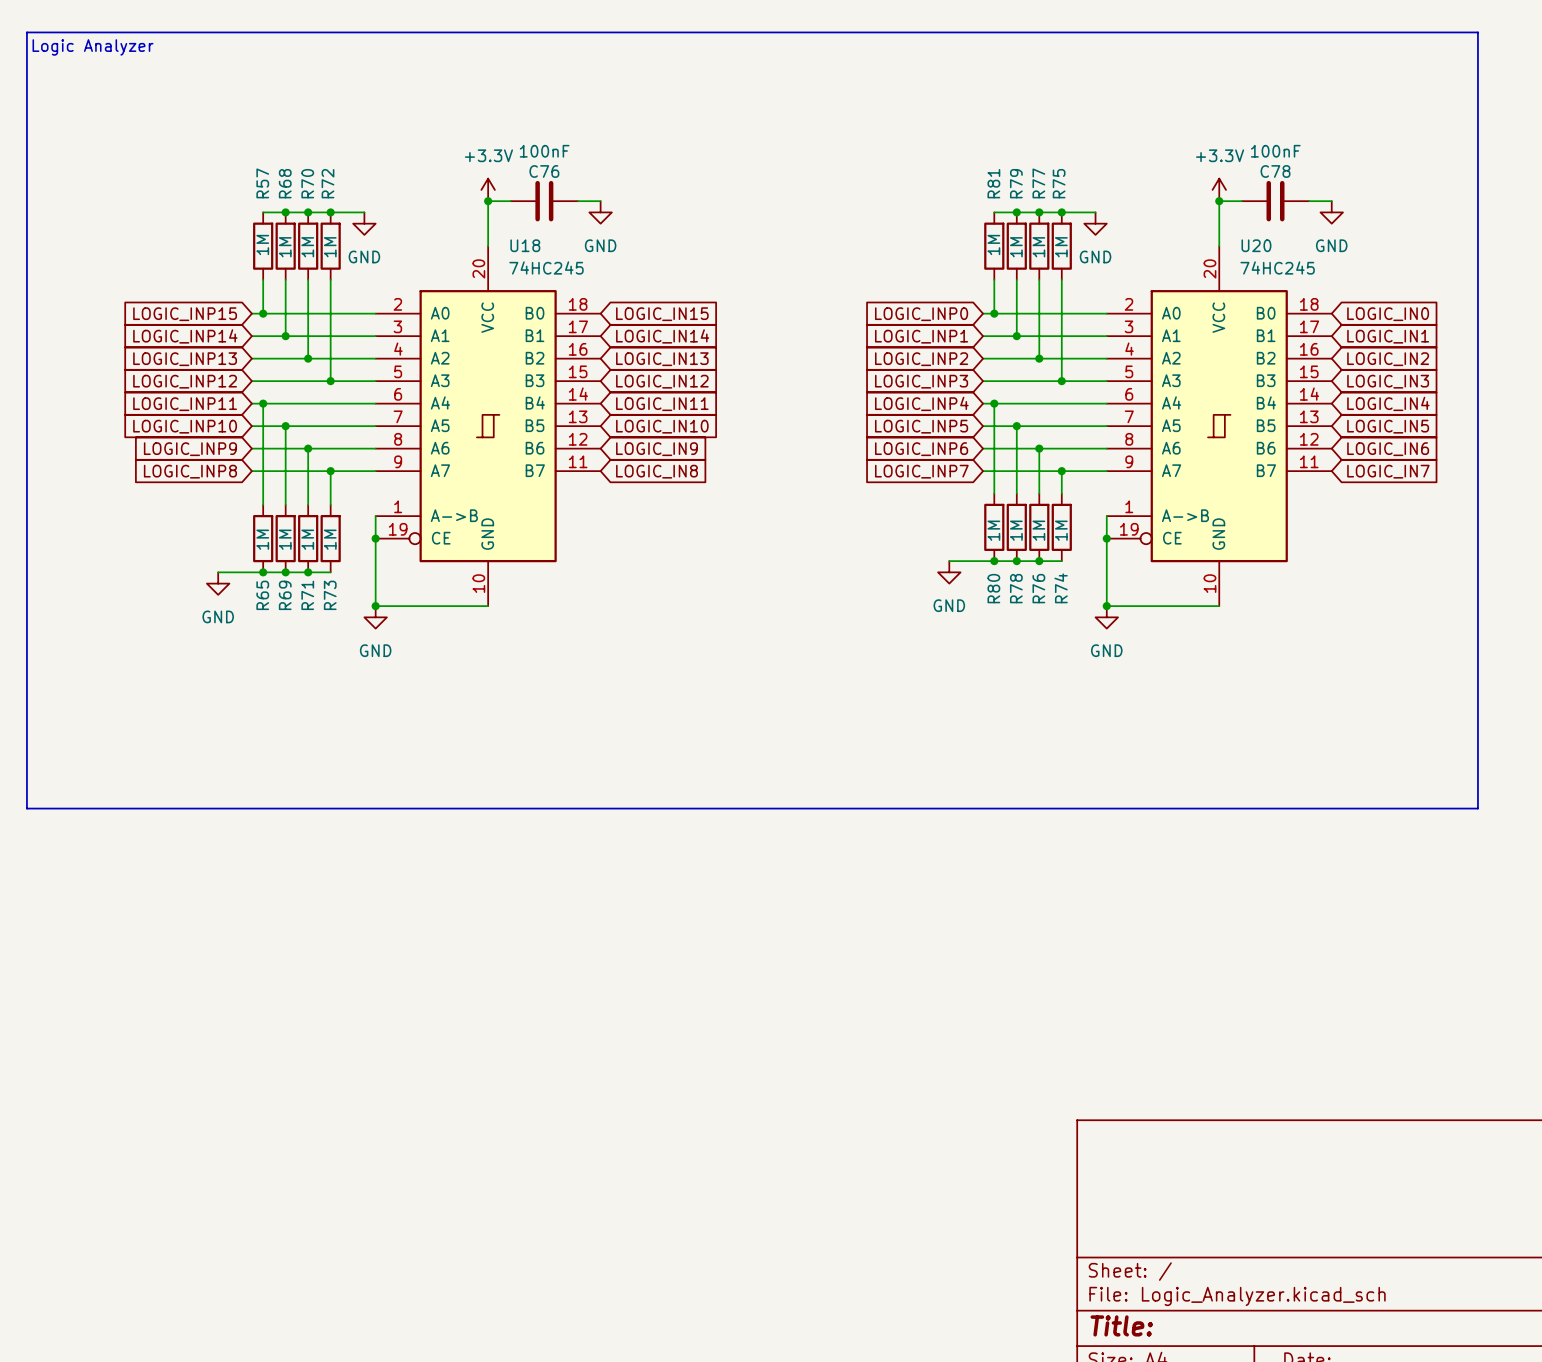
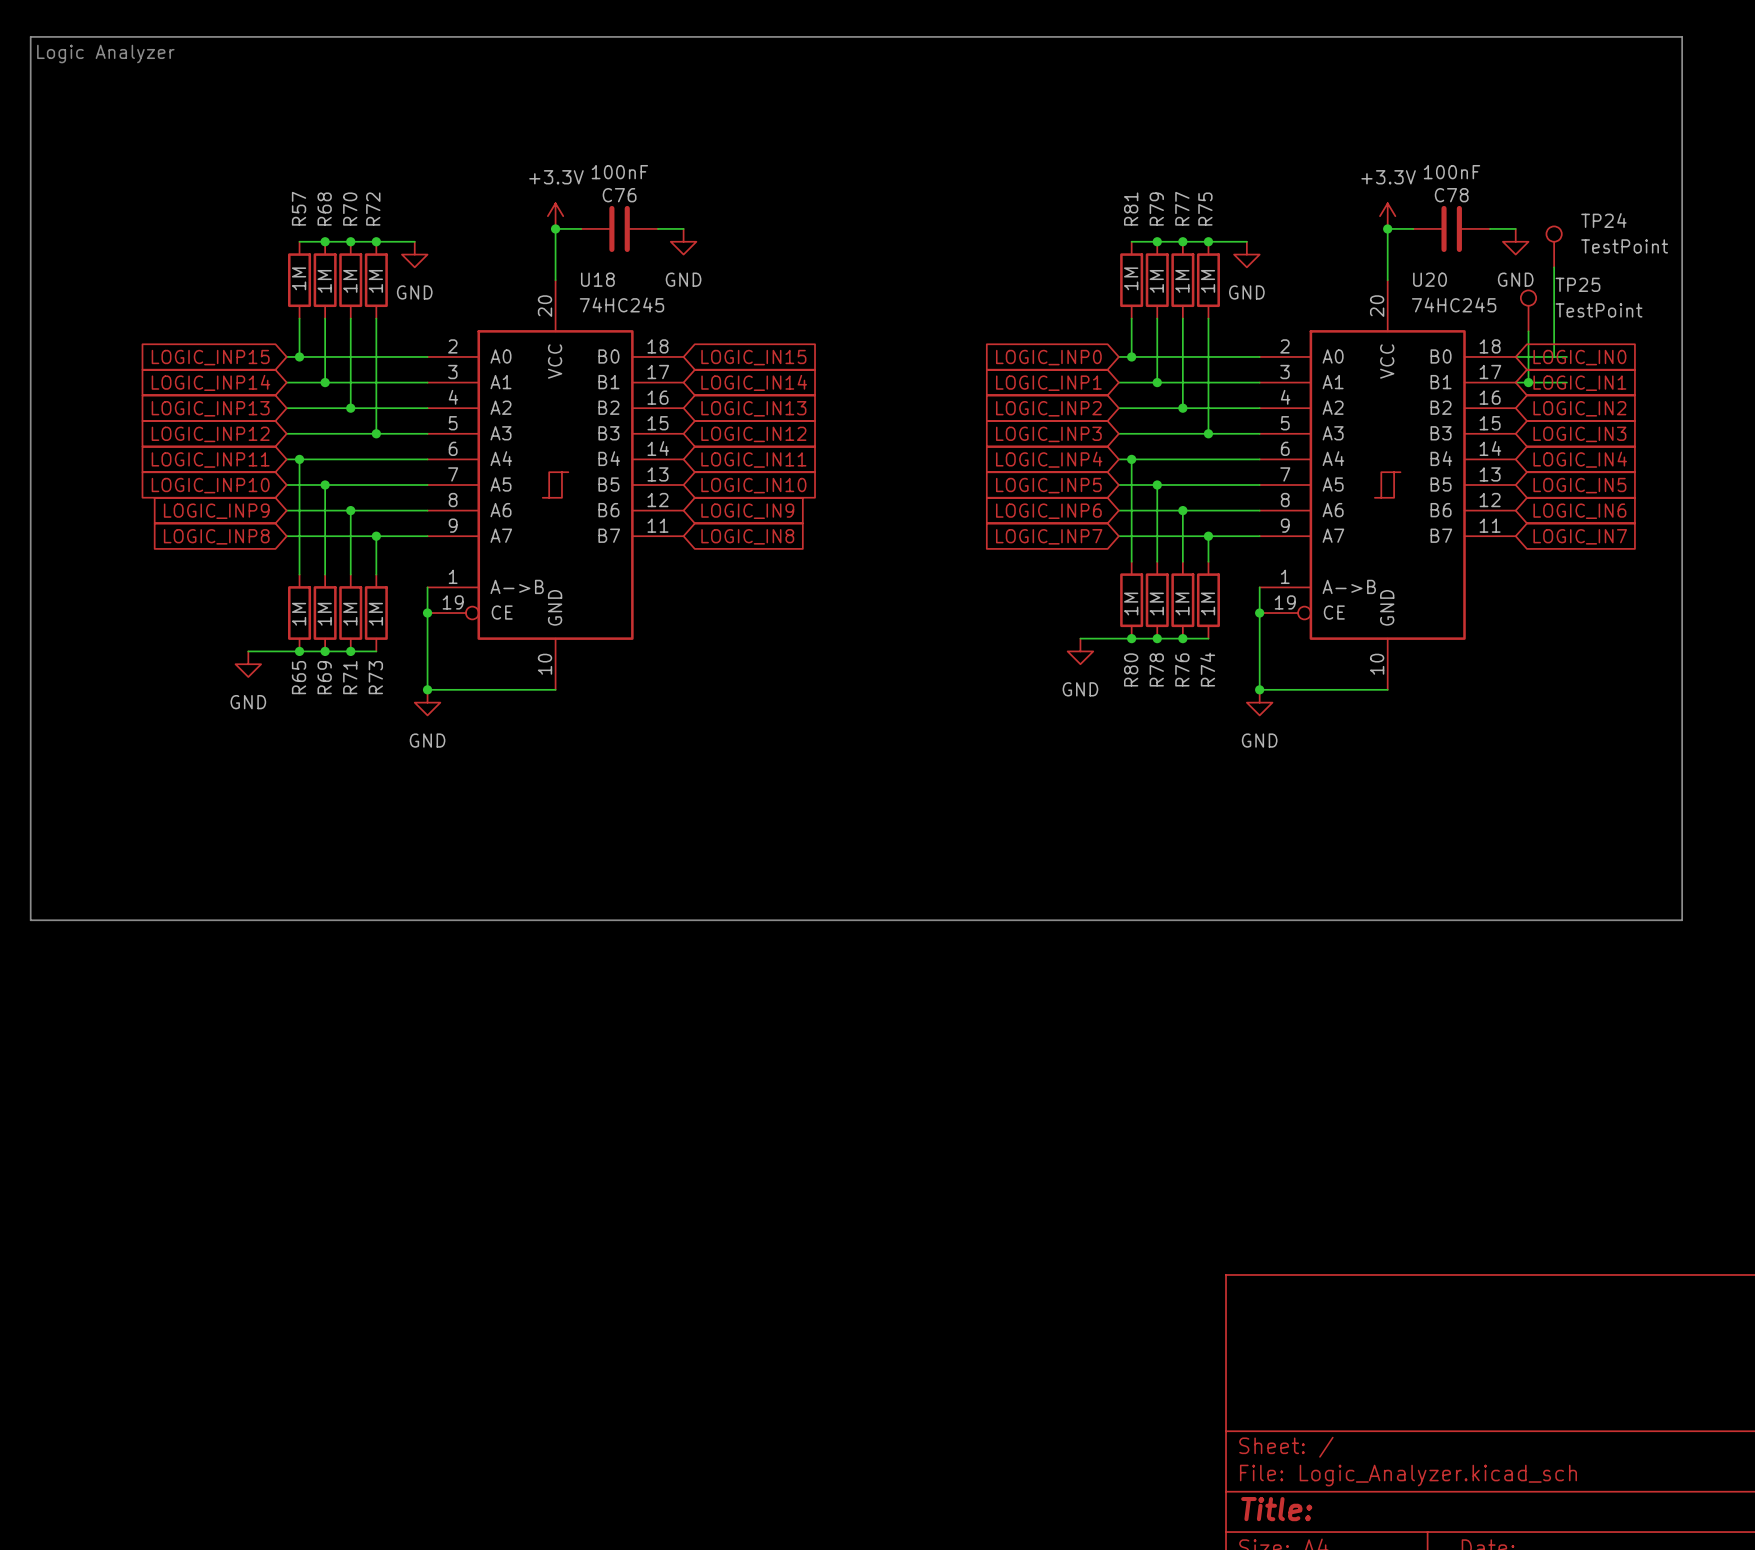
TP24: none -> TestPoint (1554, 246)
wire: none -> (1554, 267) (1554, 356)
TP25: none -> TestPoint (1528, 310)
wire: none -> (1528, 331) (1528, 382)
wire: none -> (1515, 356) (1566, 356)
wire: none -> (1515, 382) (1566, 382)
junction: none -> (1528, 382)

